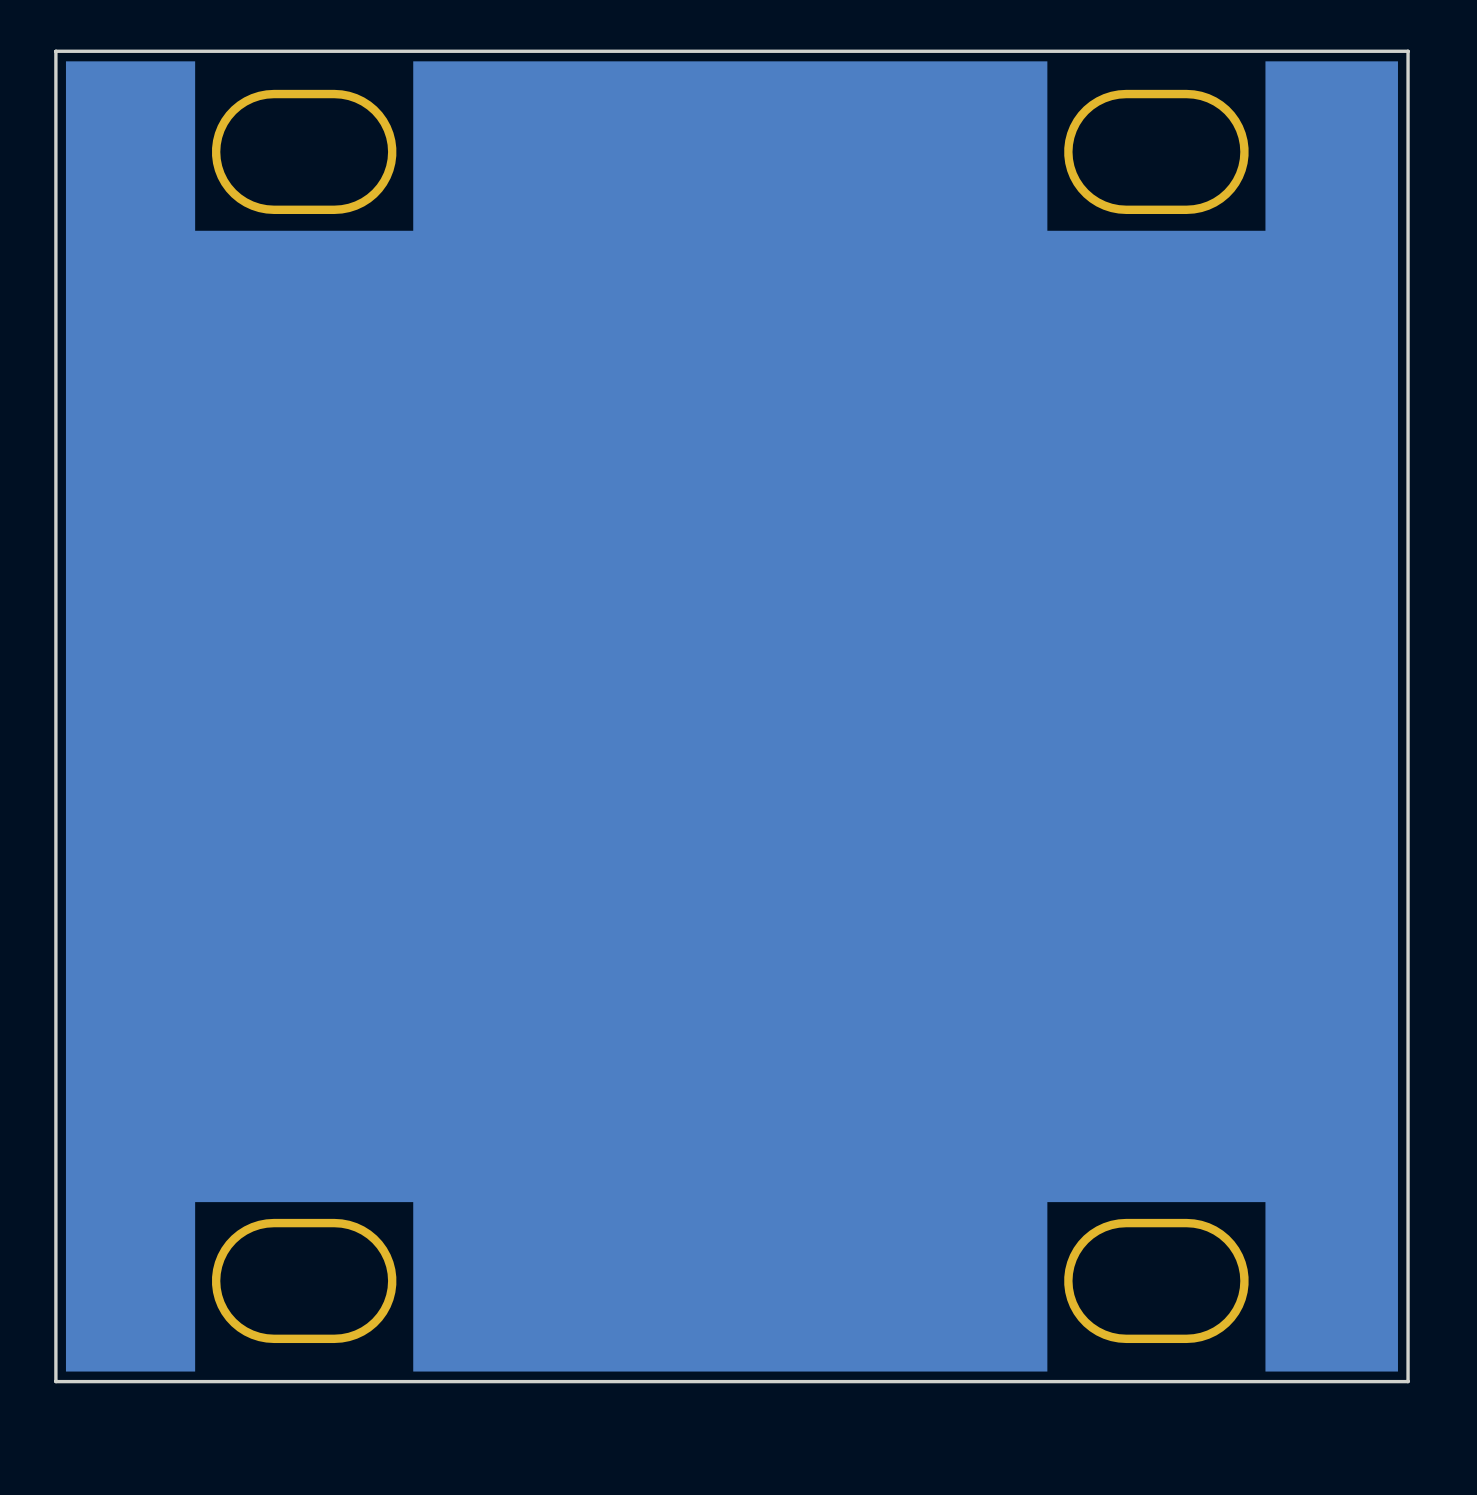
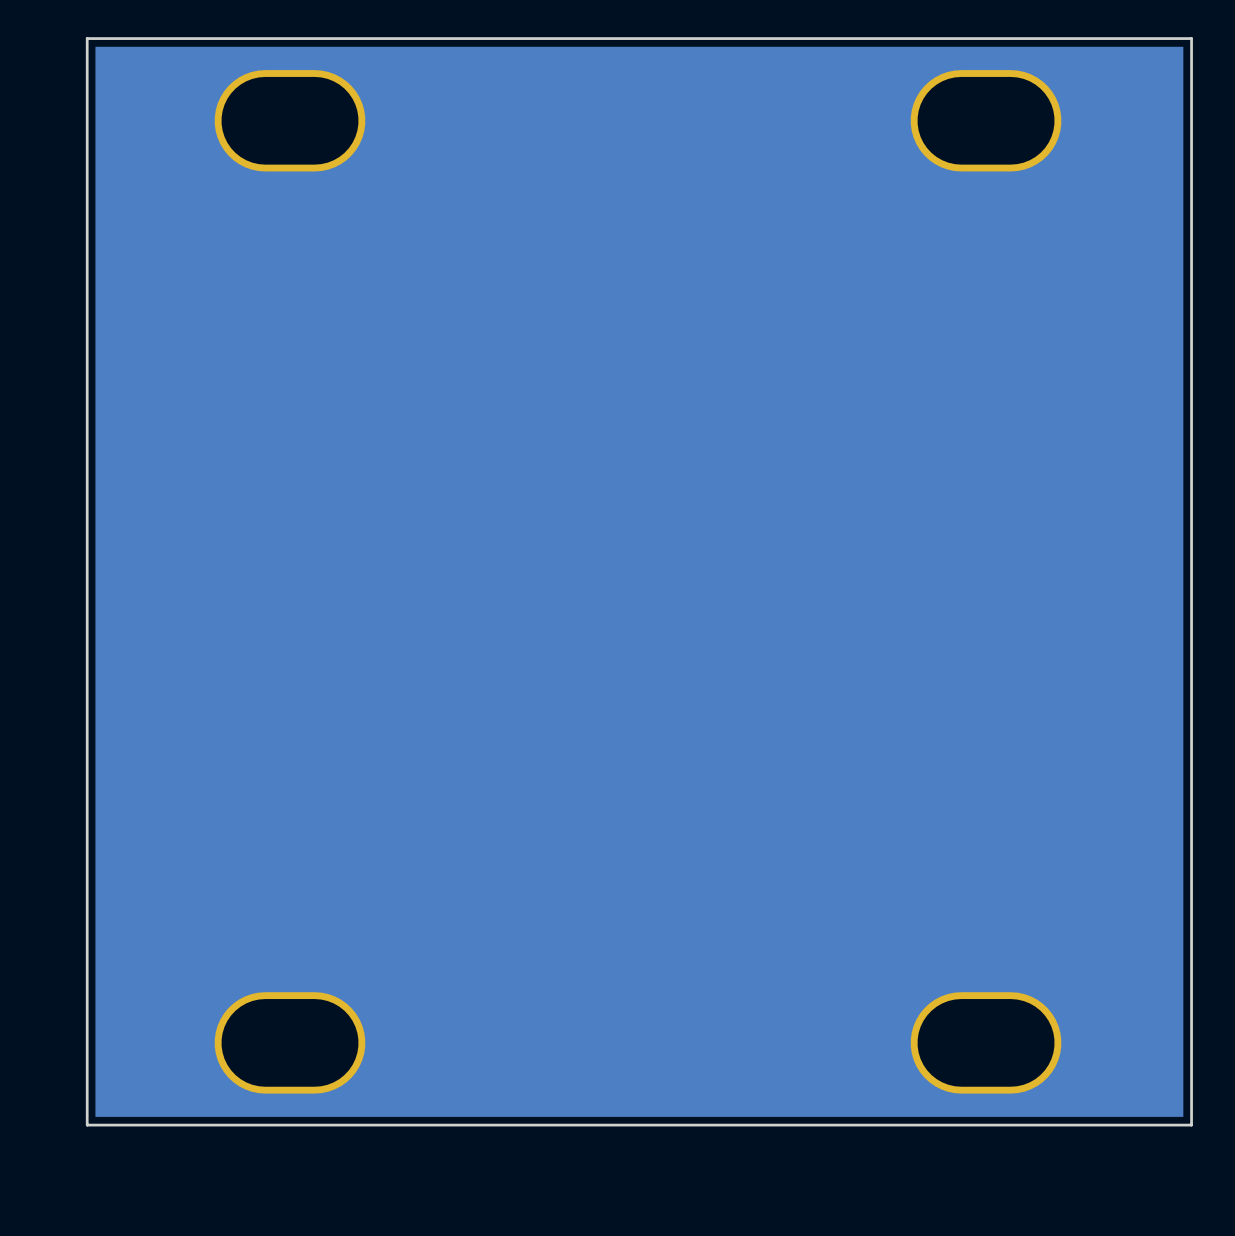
drawing: [65, 61, 196, 1372] -> none
drawing: [413, 61, 1048, 231] -> none
drawing: [1265, 61, 1398, 1372] -> none
drawing shape: [195, 230, 1266, 1203] -> [95, 46, 1184, 1117]
drawing: [413, 1202, 1048, 1372] -> none

